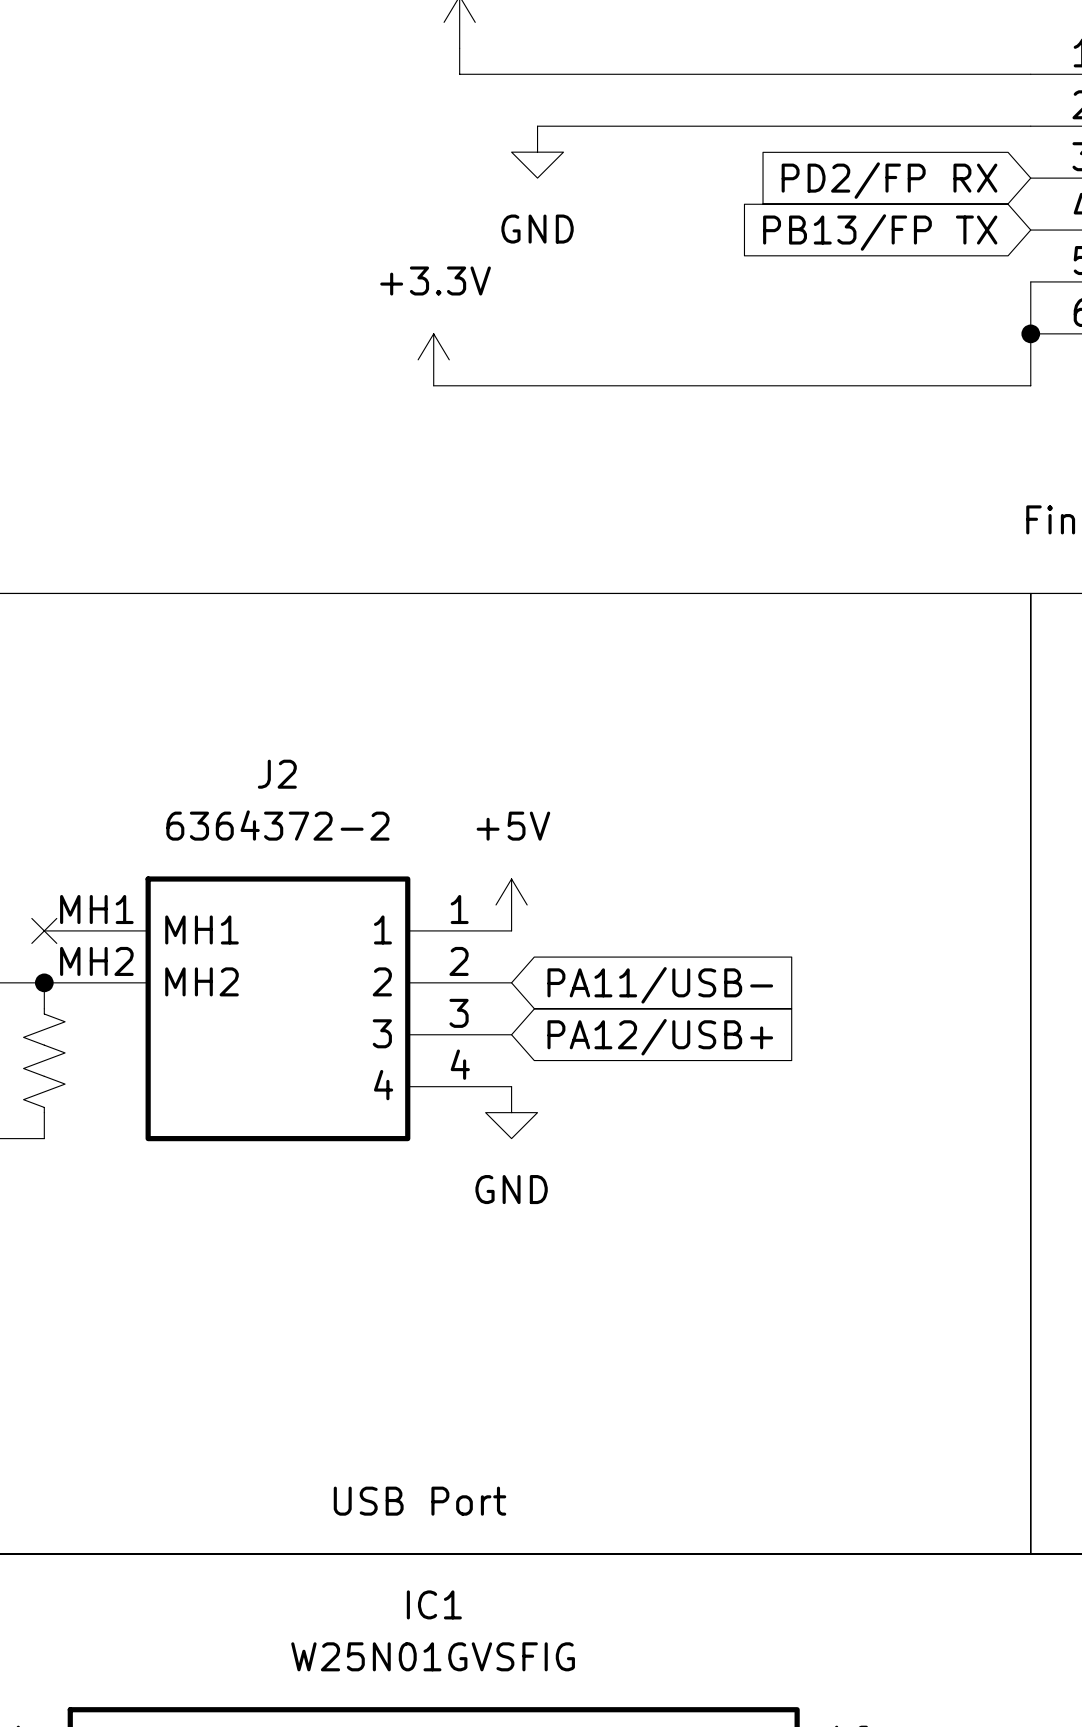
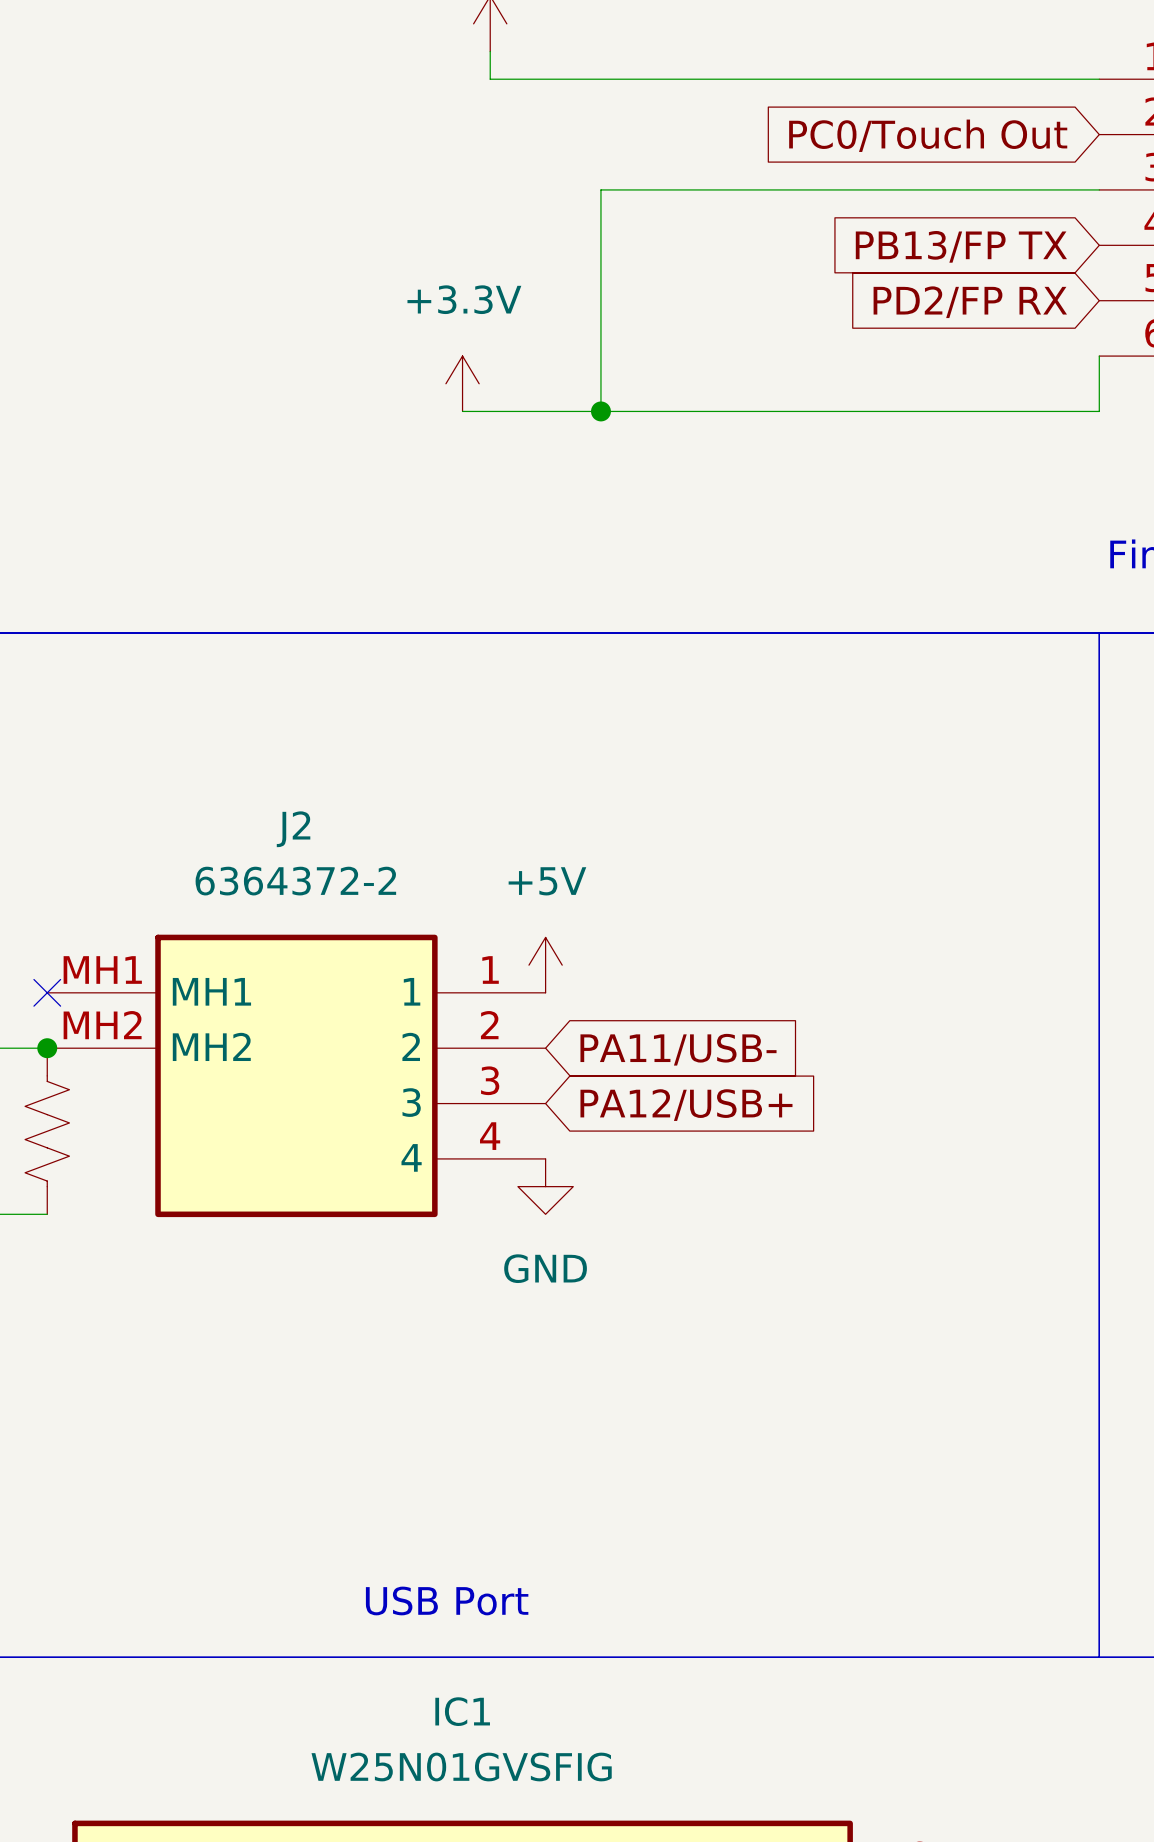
wire: (537, 126) (1030, 126) -> none
global label: none -> PC0/Touch Out (928, 135)
power symbol: GND (537, 152) -> none
wire: none -> (1099, 189) (600, 189) (600, 411)
global label position: PD2/FP RX (889, 180) -> PD2/FP RX (970, 302)
wire: (1030, 281) (1030, 333) -> none
junction: (1030, 333) -> none
junction: none -> (600, 411)

